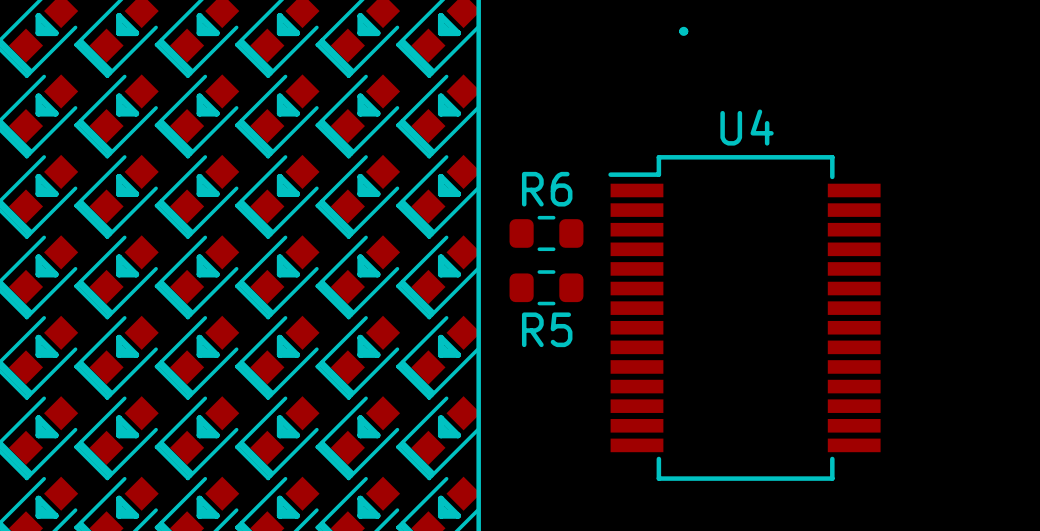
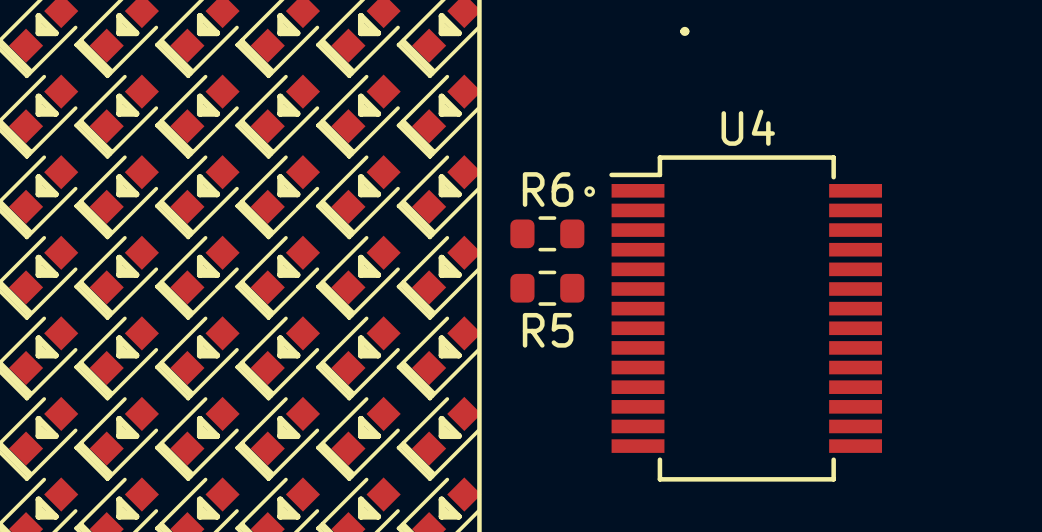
drawing: none -> [584, 186, 595, 197]

